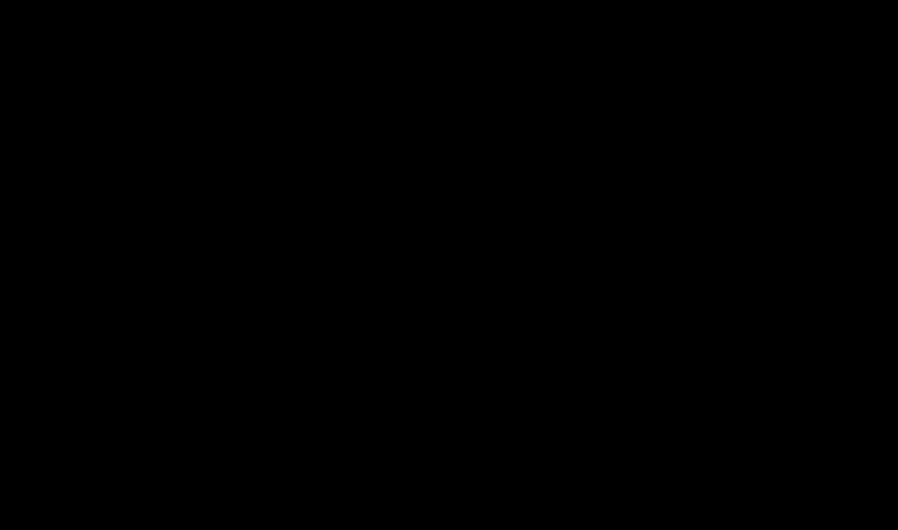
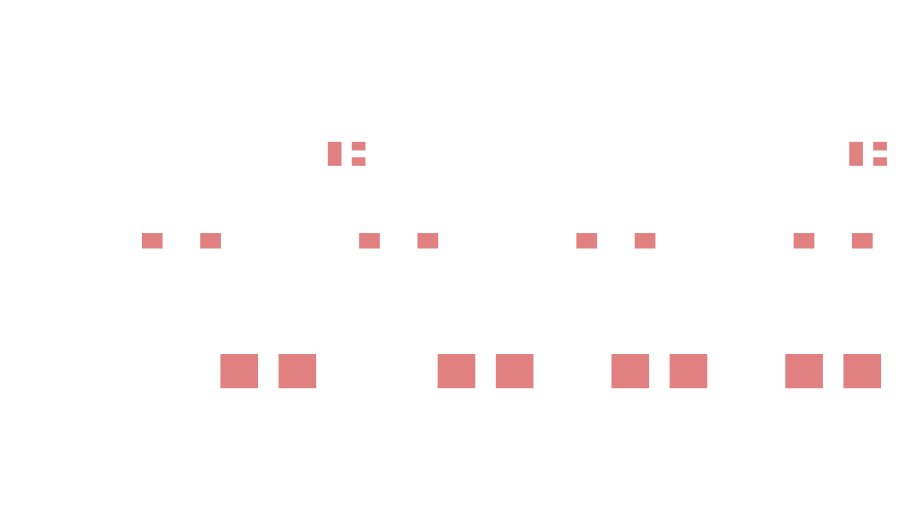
part: none -> (346, 153)
part: none -> (868, 153)
part: none -> (181, 240)
part: none -> (398, 240)
part: none -> (615, 240)
part: none -> (833, 240)
part: none -> (268, 371)
part: none -> (485, 371)
part: none -> (659, 371)
part: none -> (833, 371)

